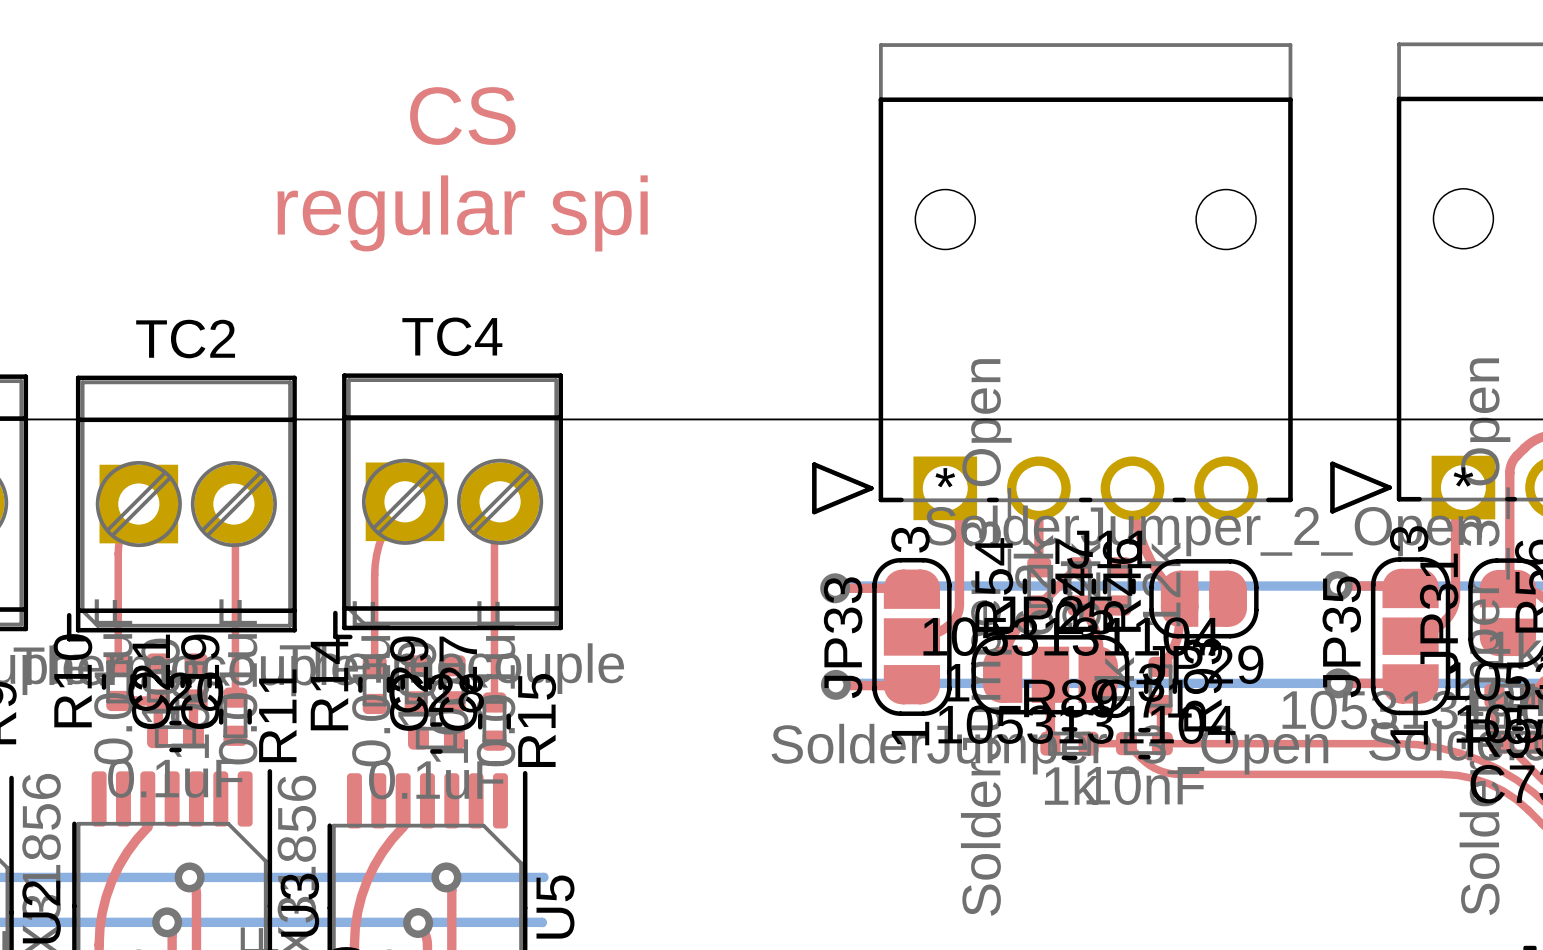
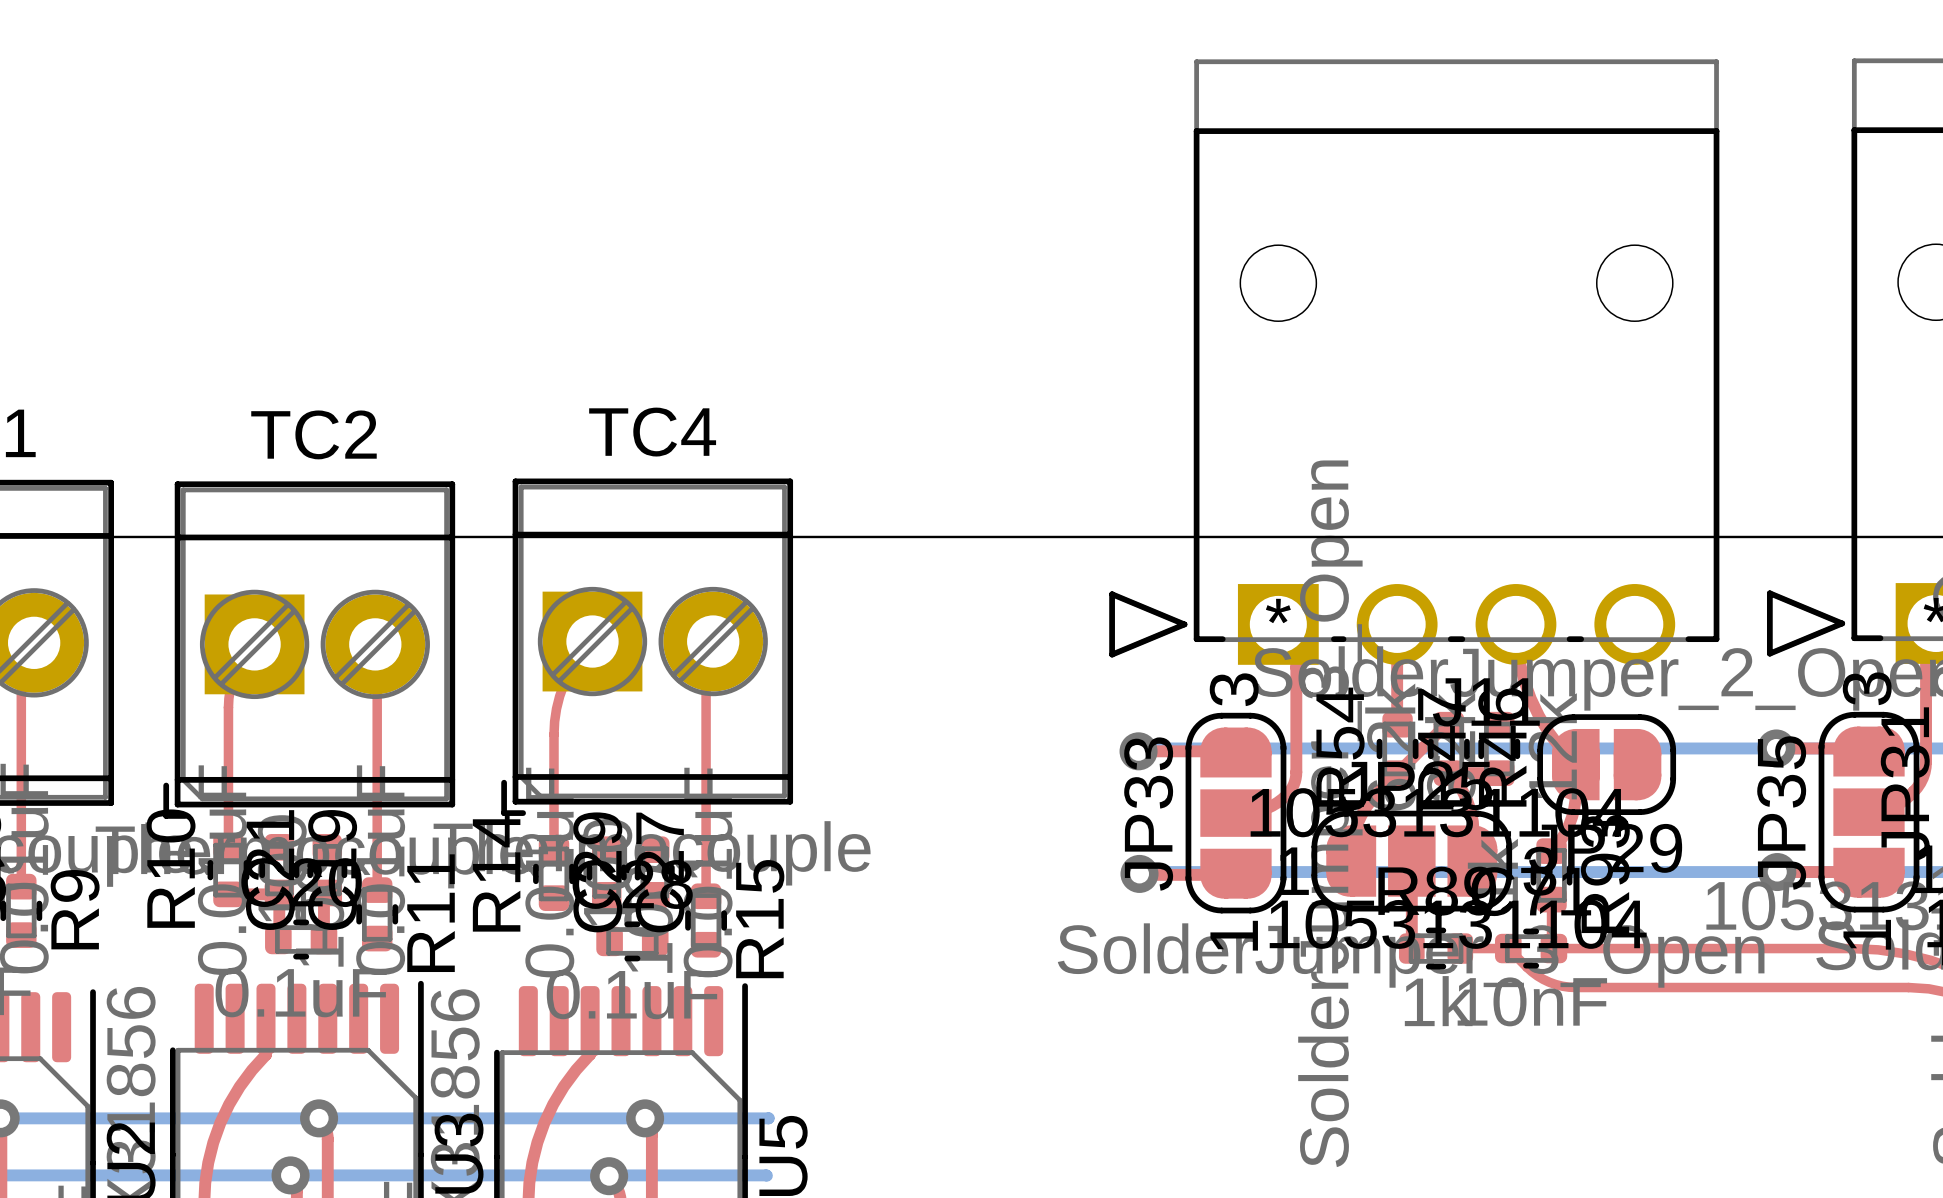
text: CS (462, 116) -> none
text: regular spi (462, 213) -> none

